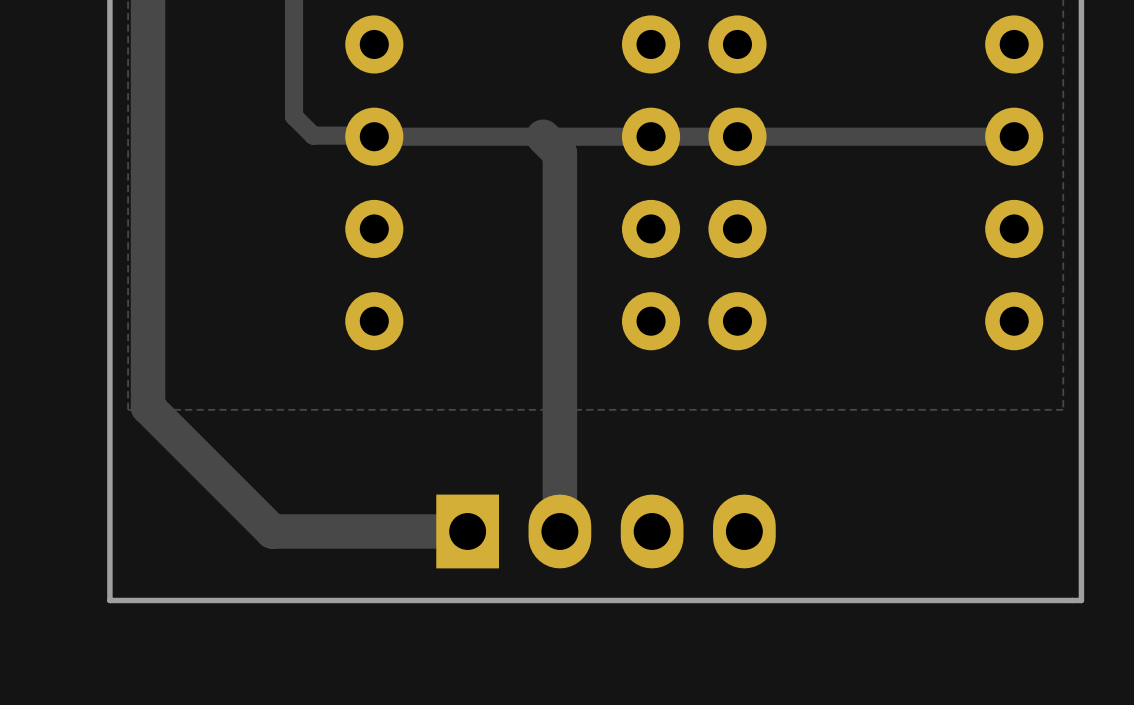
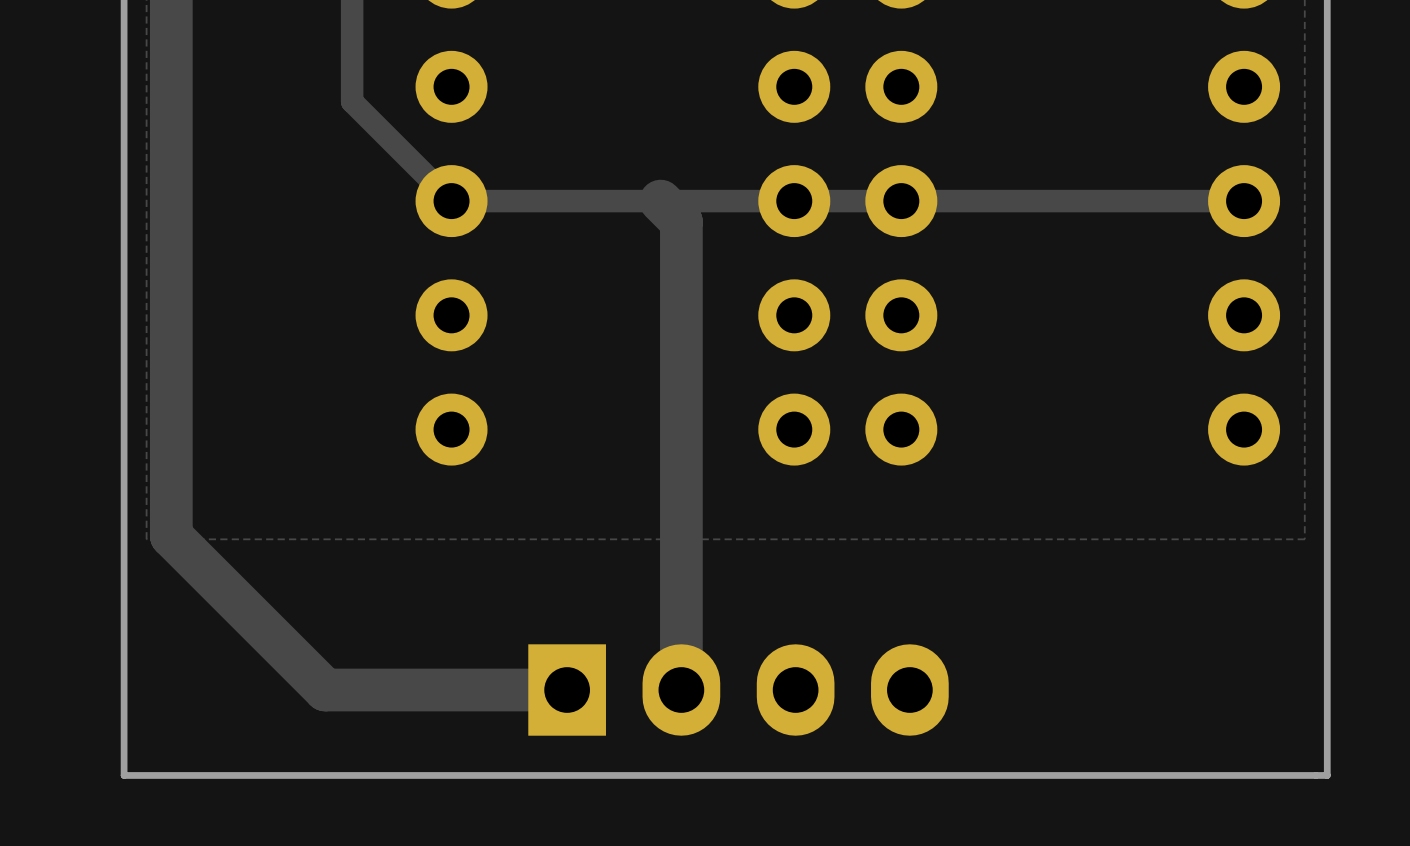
track: (294, 56) (294, 116) (313, 135) (373, 135) -> (352, 101) (450, 199)

